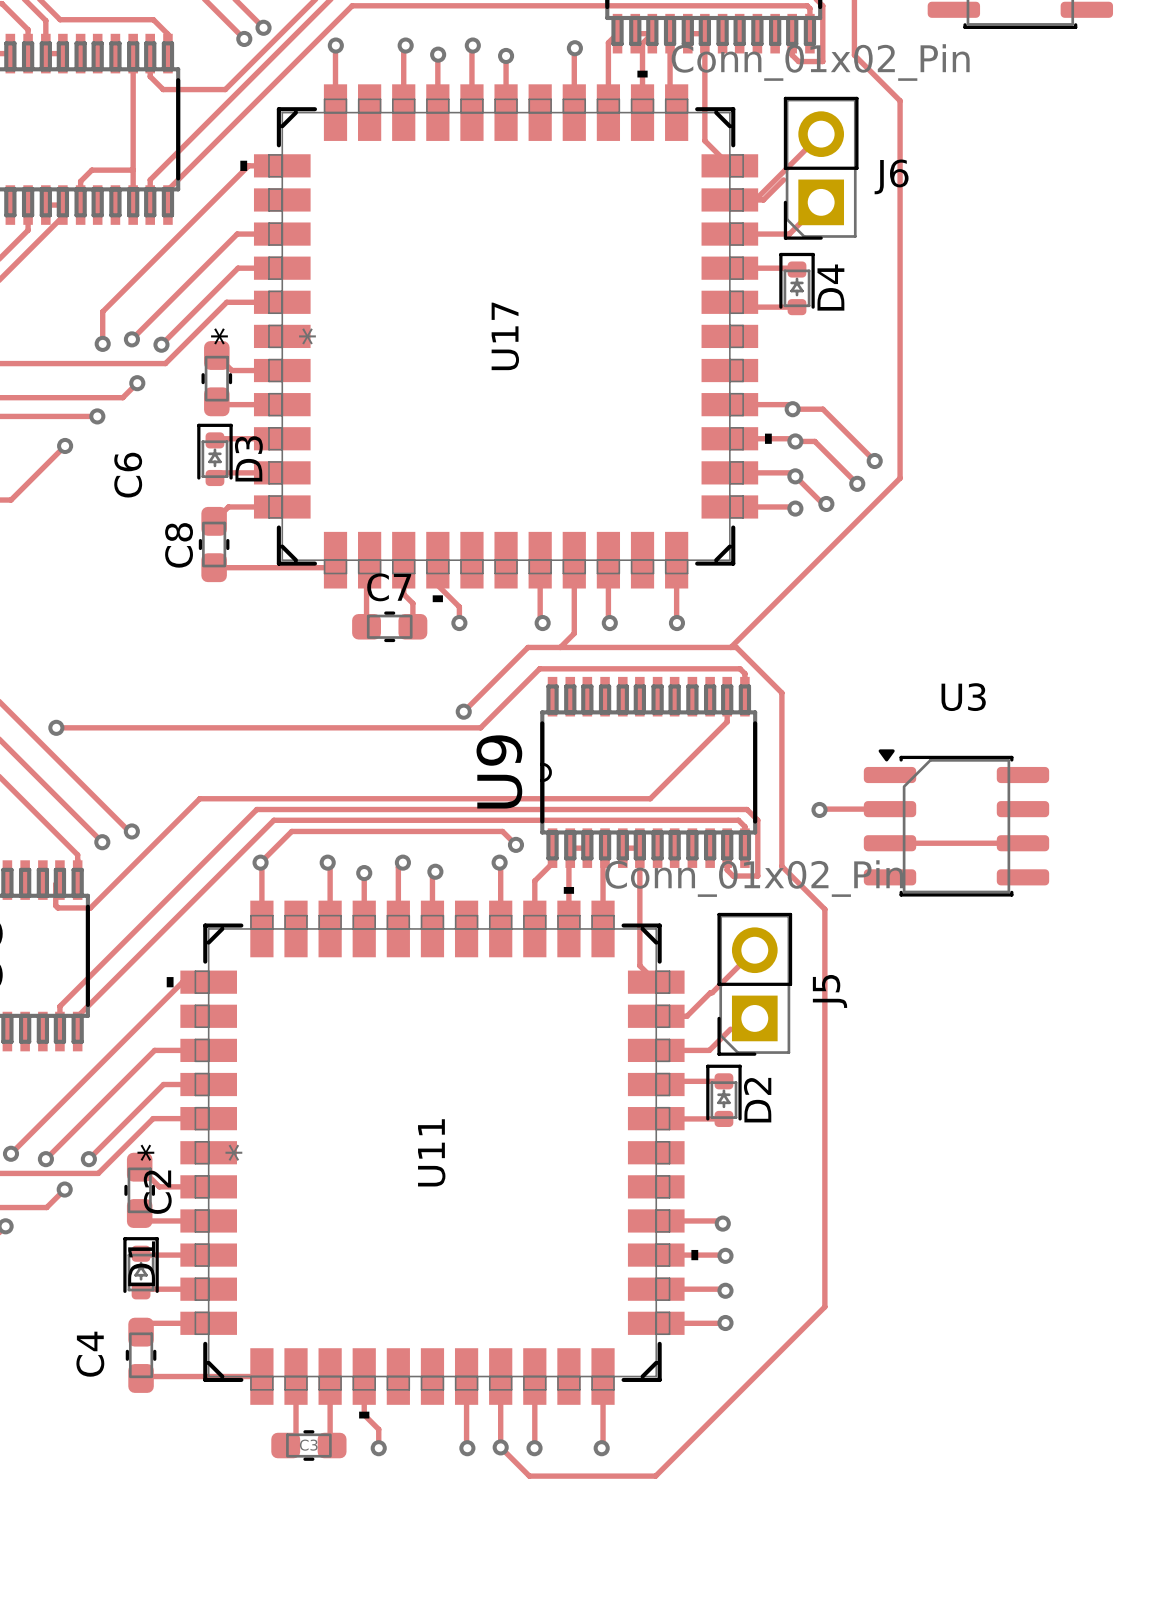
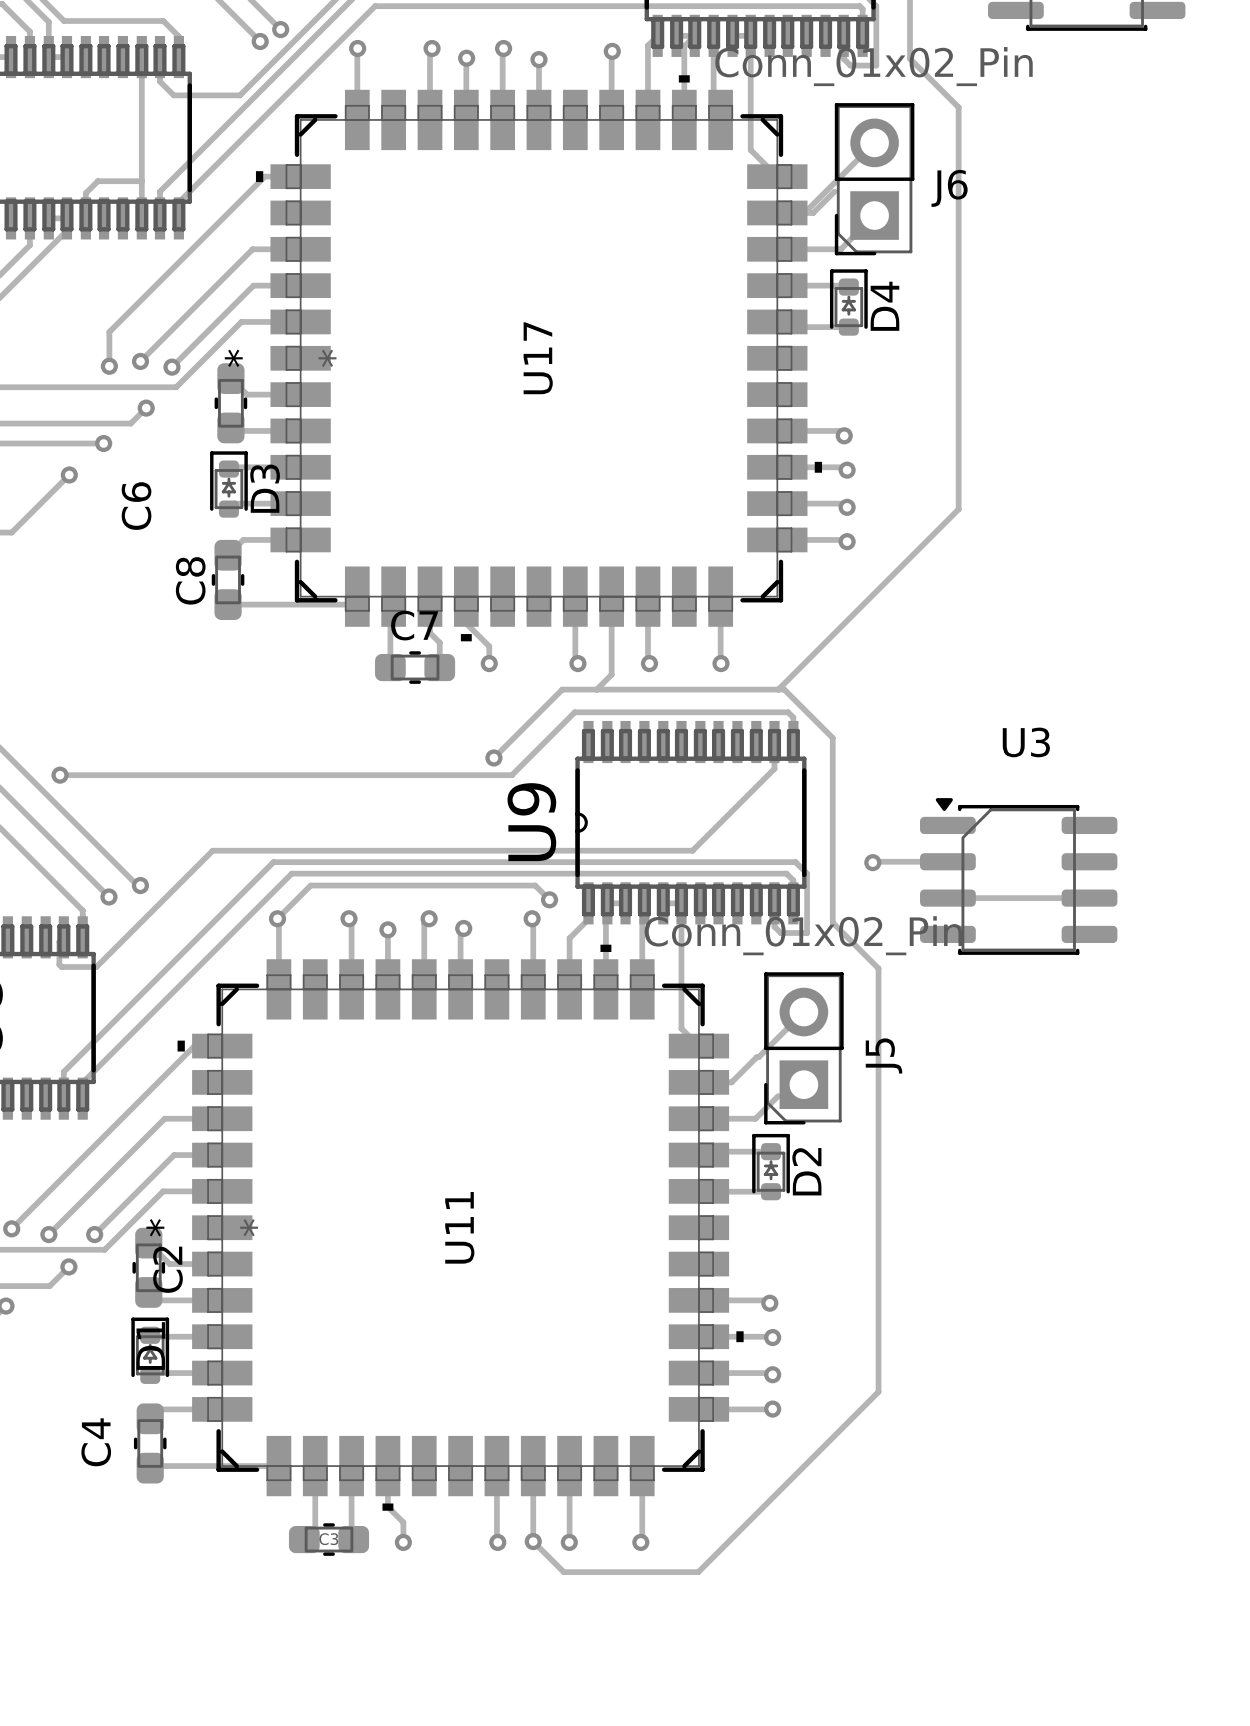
track: (792, 409) (822, 409) (874, 461) -> none
track: (795, 441) (814, 441) (857, 483) -> none
via: (874, 461) -> none
track: (795, 476) (823, 503) (826, 503) -> none
via: (857, 483) -> none
via: (826, 503) -> none

